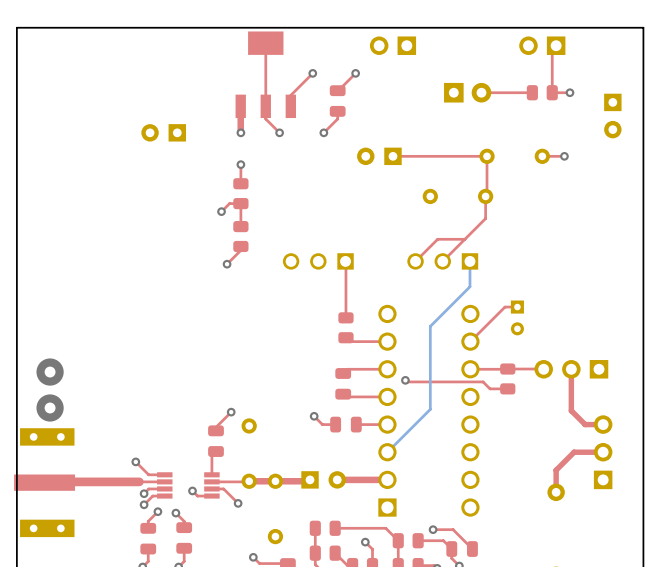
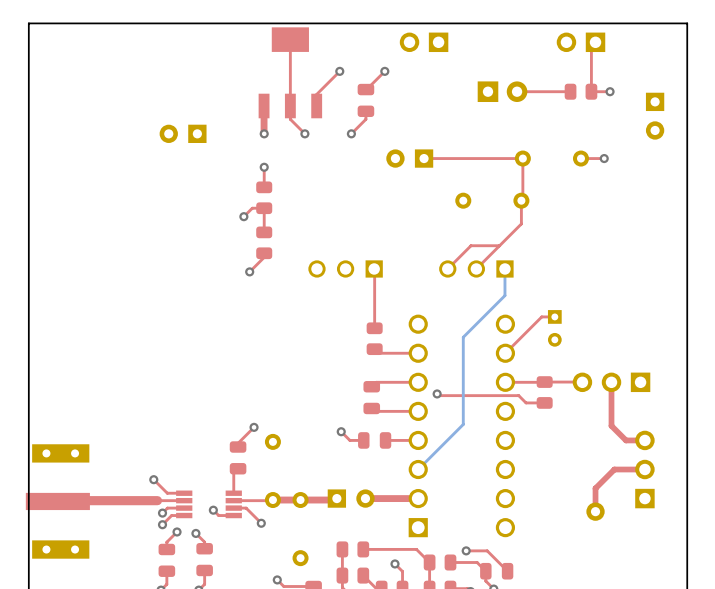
via: (50, 372) -> none
via: (50, 407) -> none

